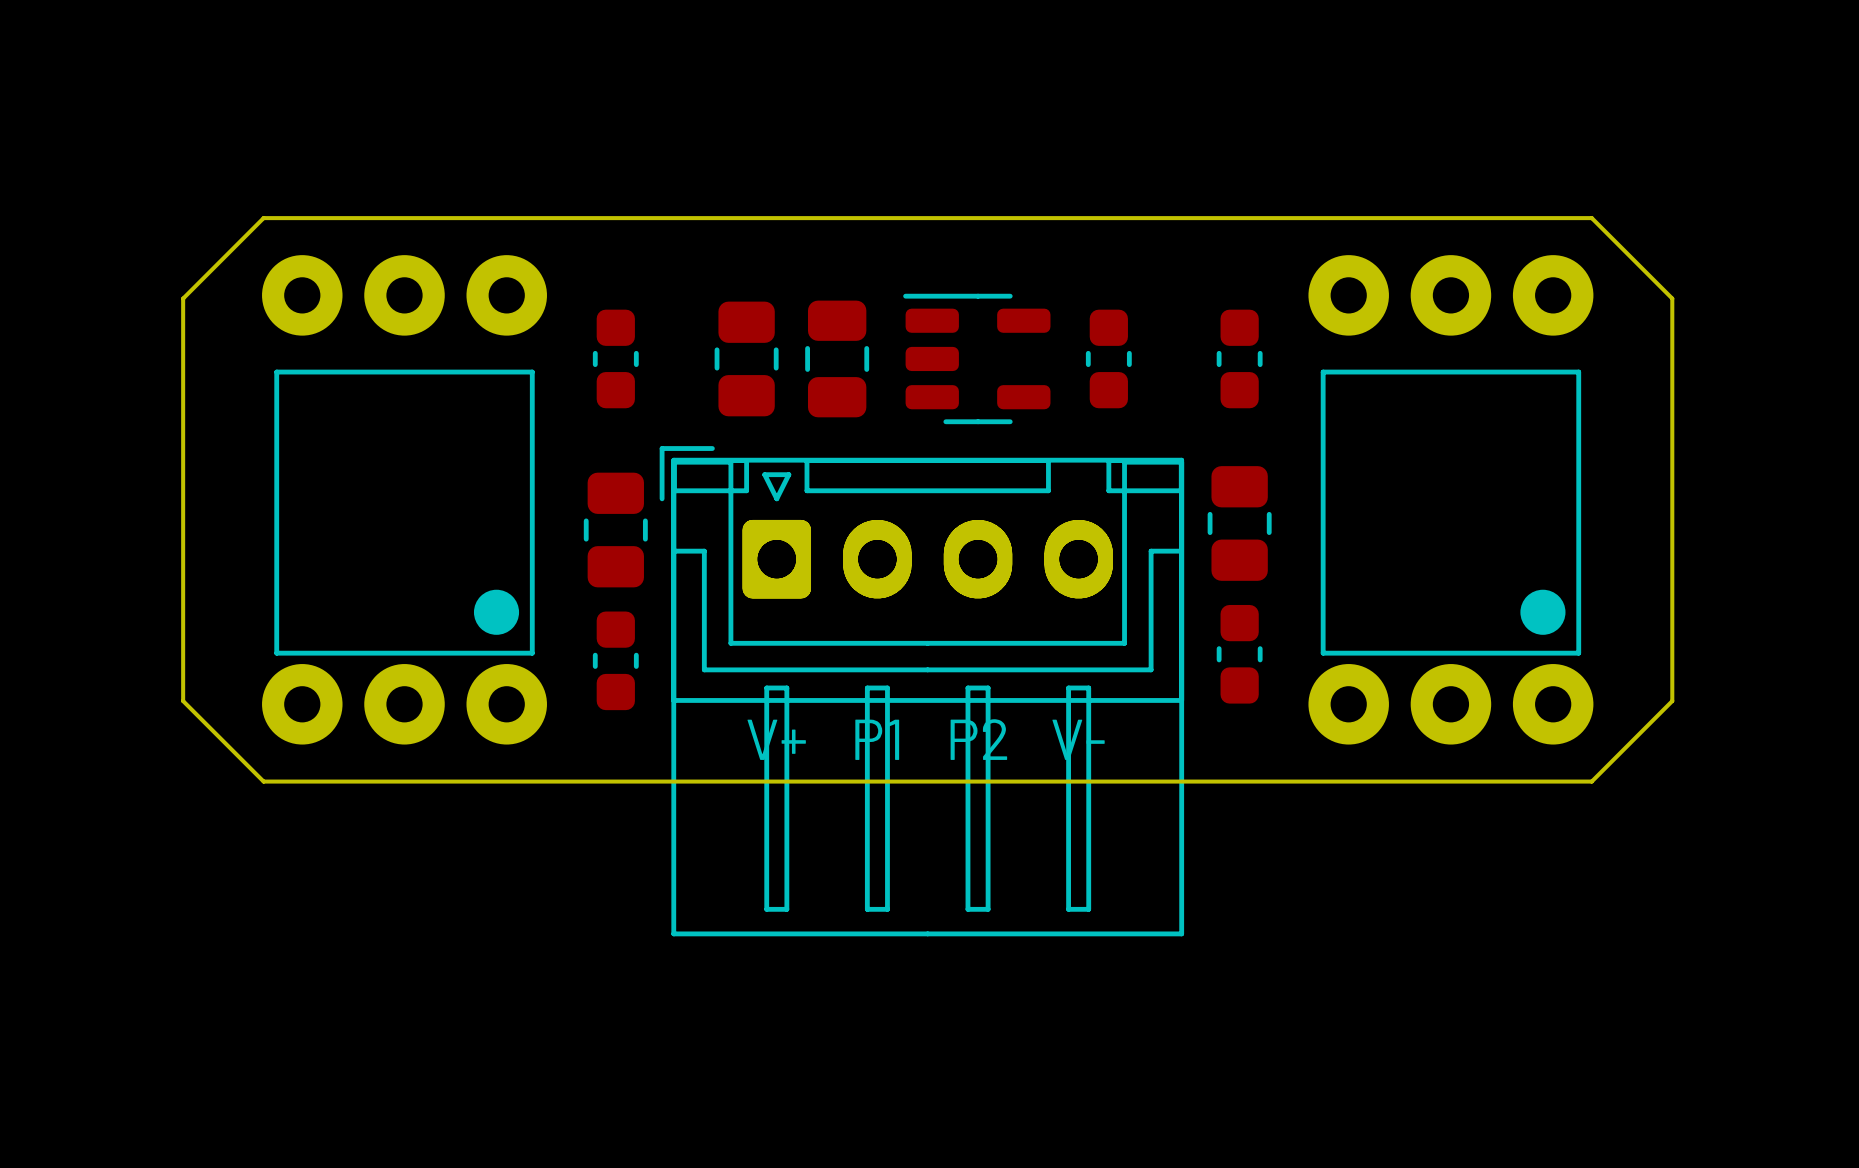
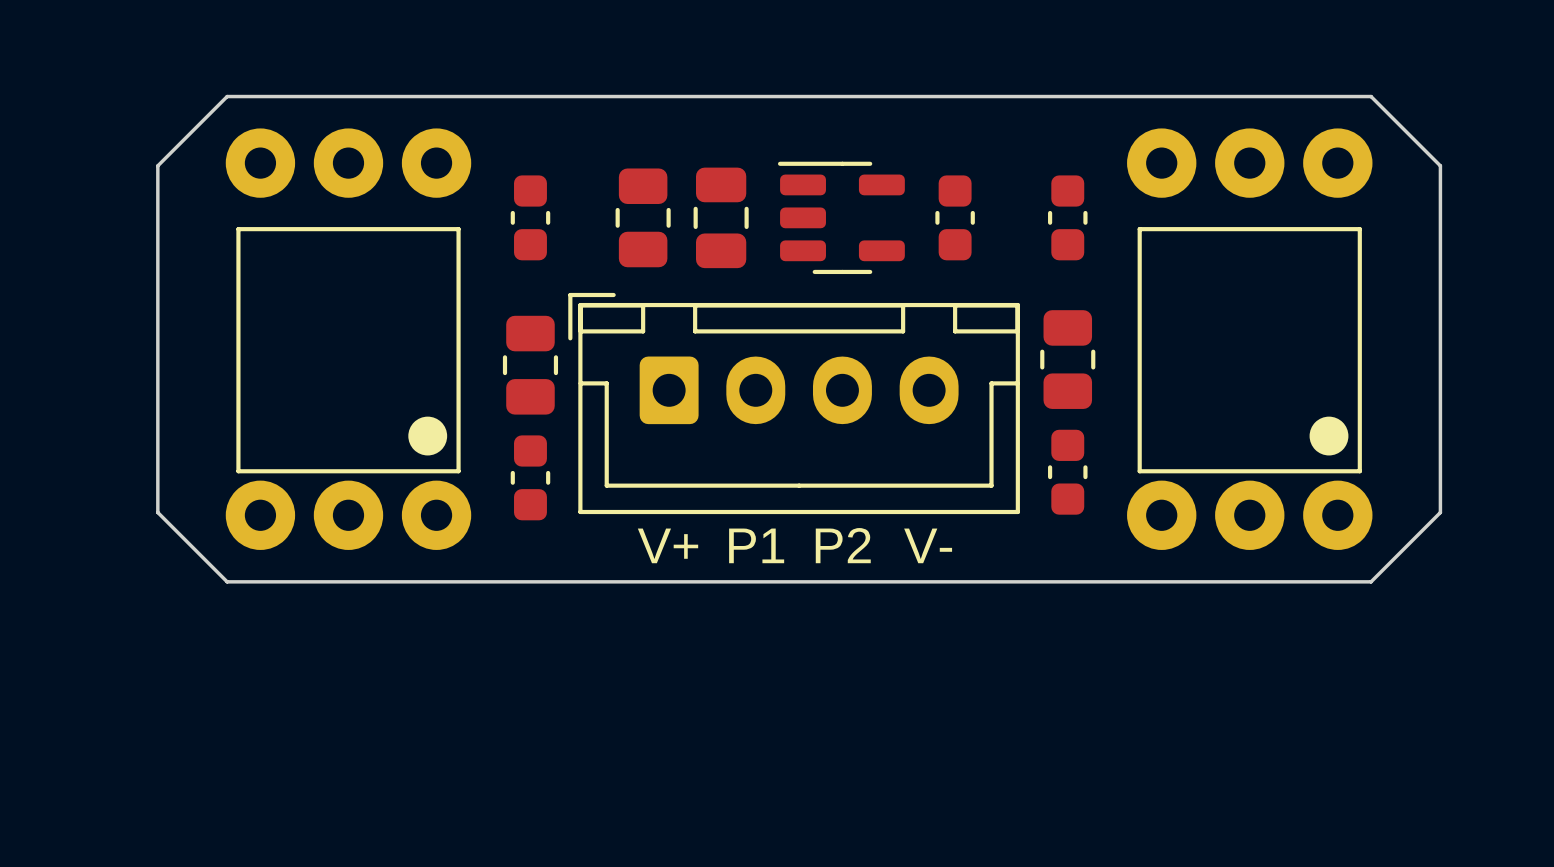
part: (927, 698) -> none

